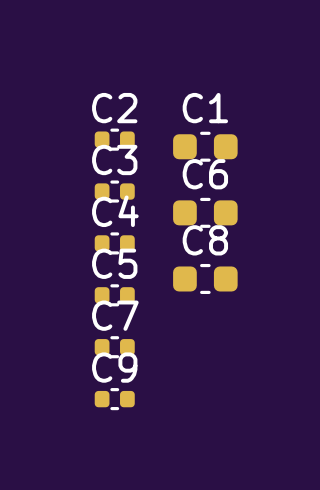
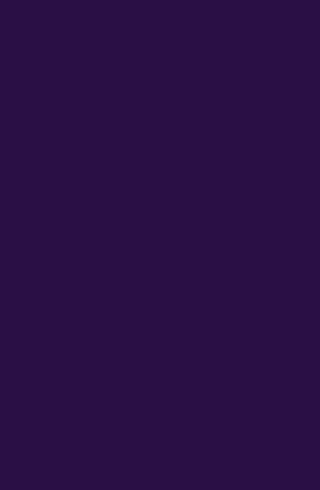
C2: (114, 139) -> none
C1: (205, 146) -> none
C3: (114, 191) -> none
C6: (205, 212) -> none
C4: (114, 243) -> none
C8: (205, 278) -> none
C5: (114, 295) -> none
C7: (114, 347) -> none
C9: (114, 399) -> none

